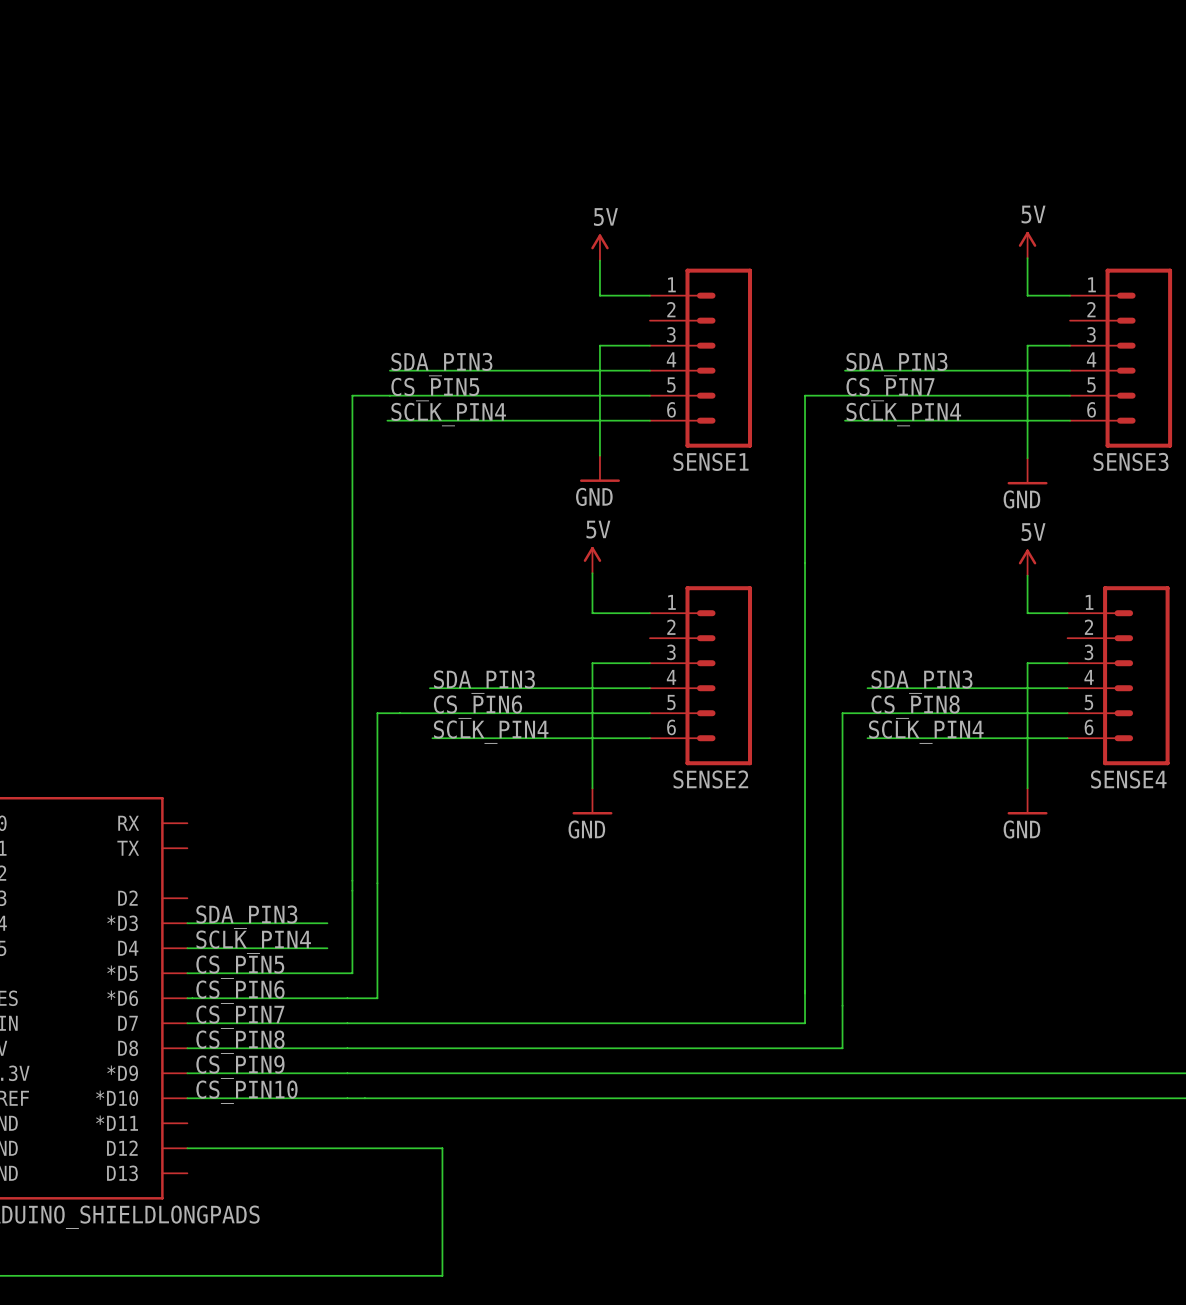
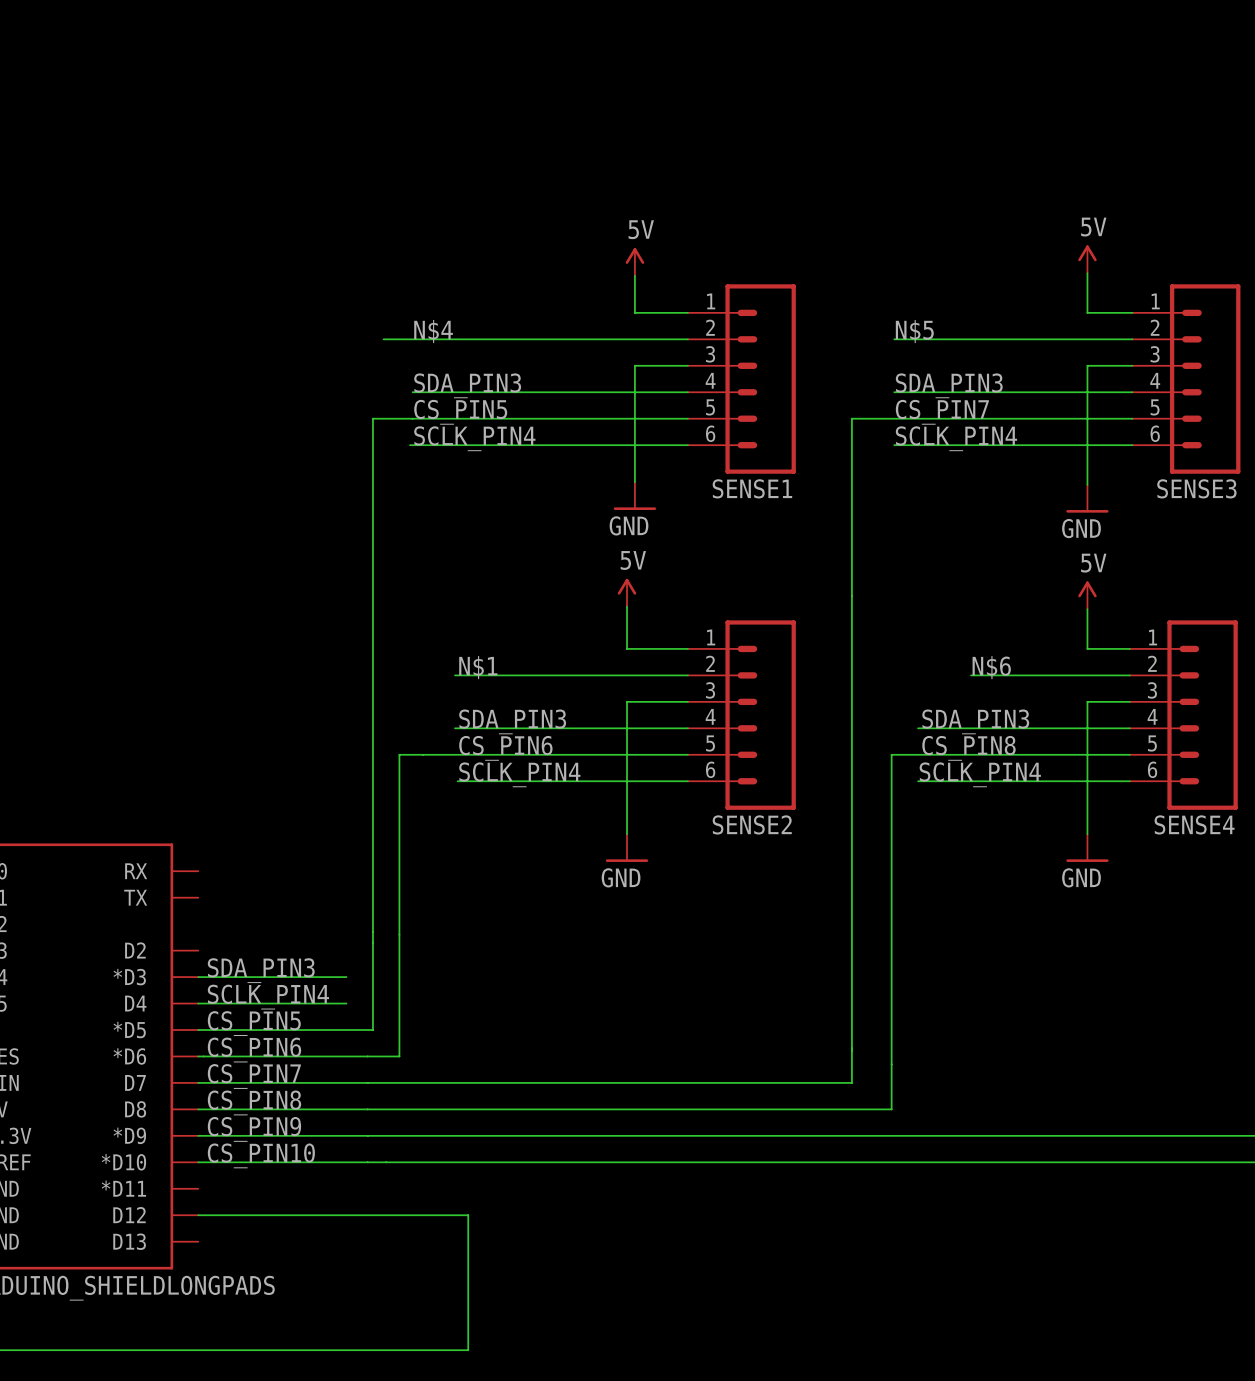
label: none -> N$4 (433, 331)
label: none -> N$5 (914, 331)
wire: none -> (383, 339) (687, 339)
wire: none -> (894, 339) (1132, 339)
label: none -> N$1 (478, 667)
label: none -> N$6 (991, 667)
wire: none -> (455, 675) (687, 675)
wire: none -> (971, 675) (1129, 675)

